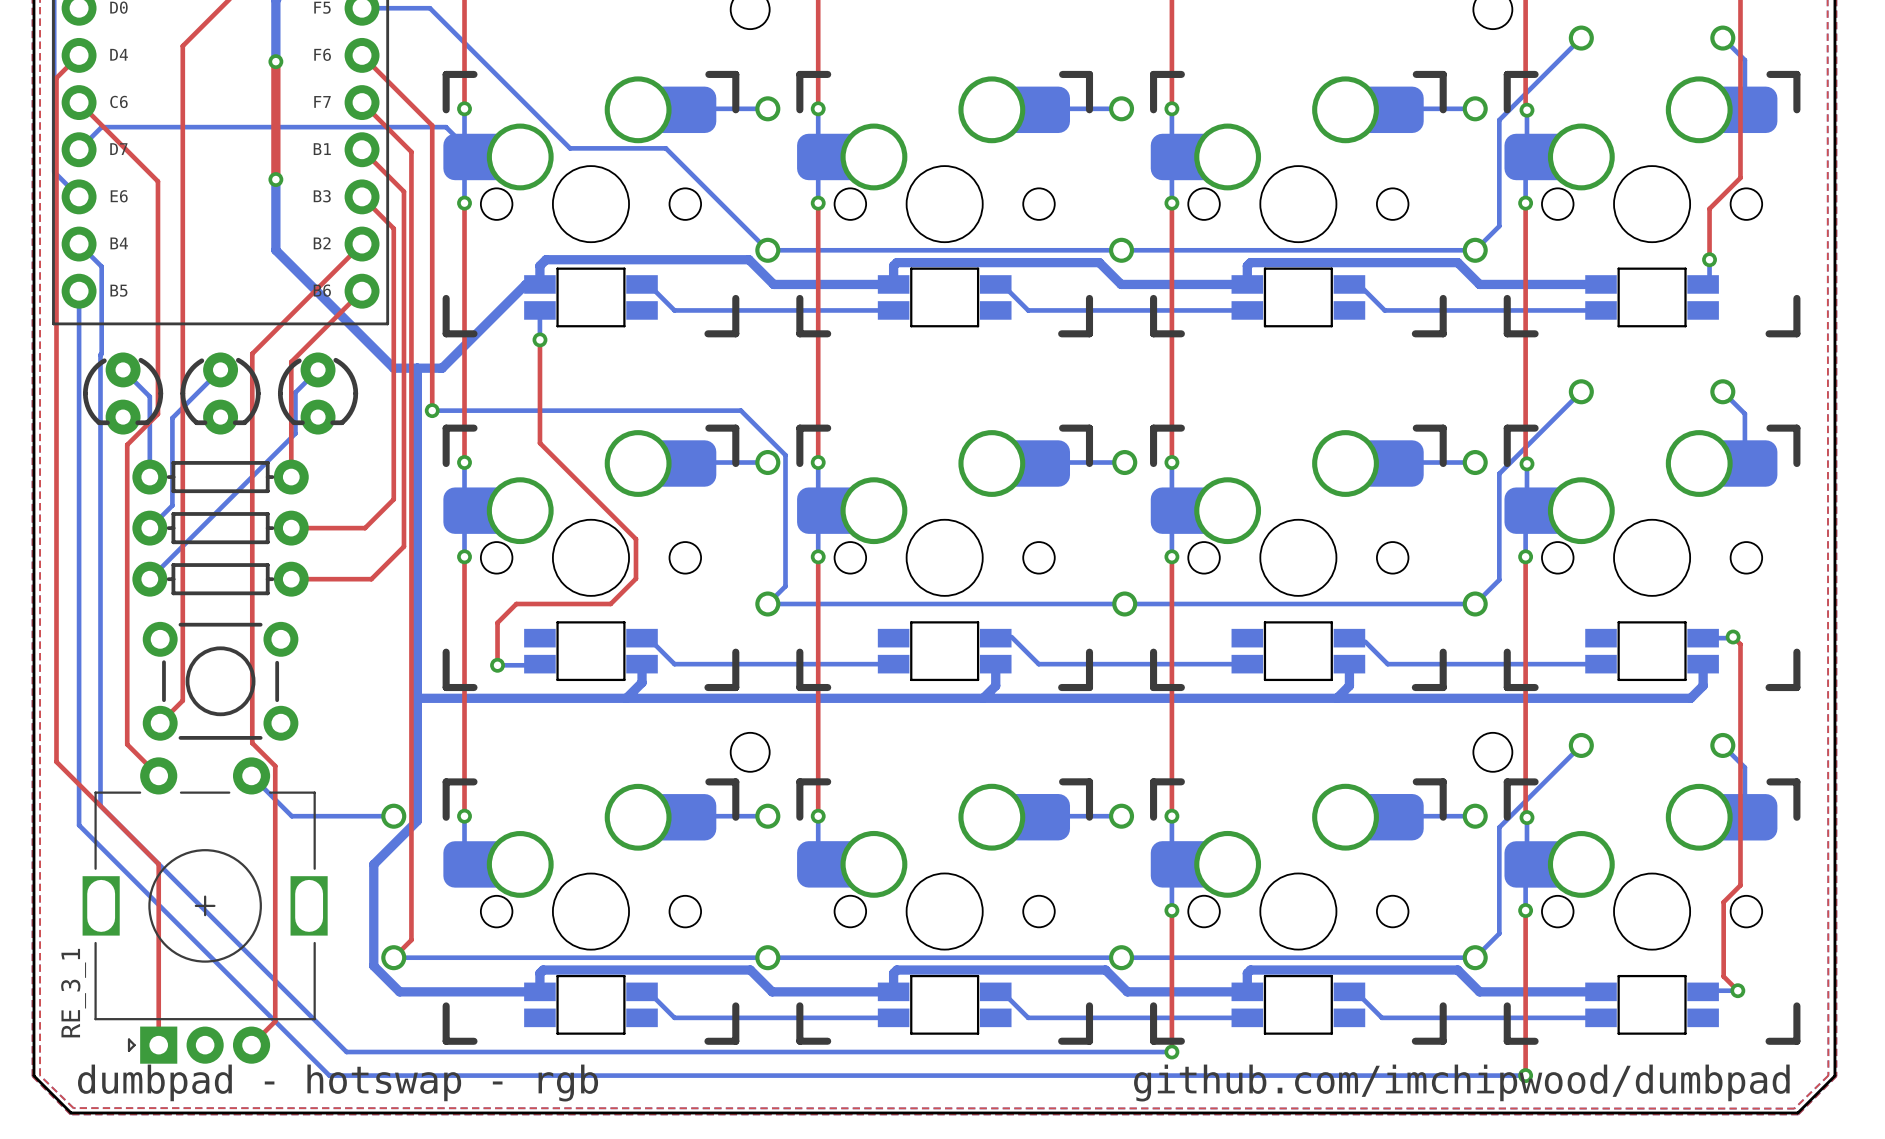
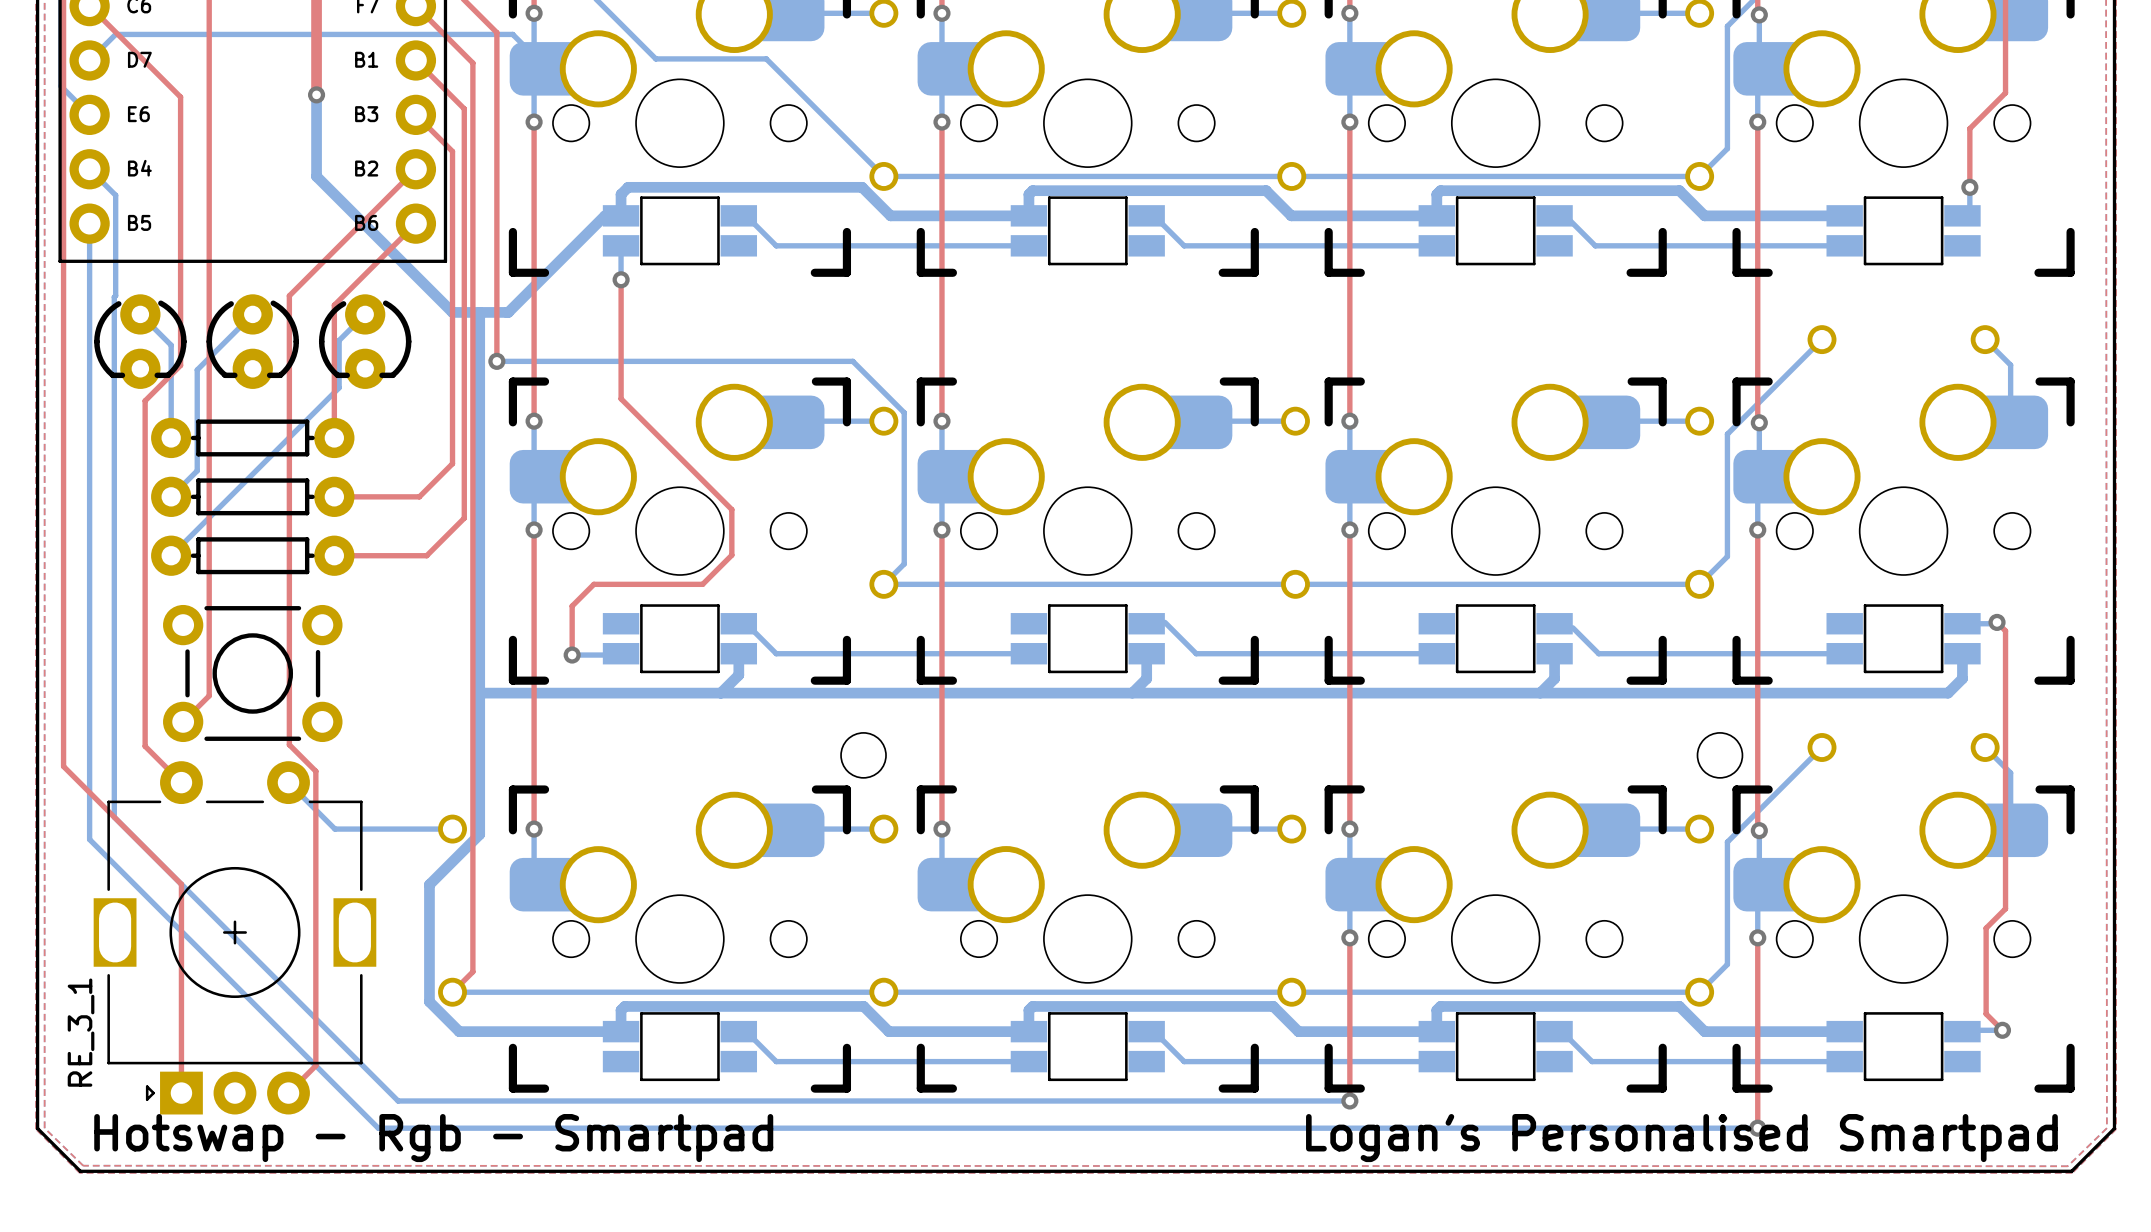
text: dumbpad - hotswap - rgb (338, 1083) -> Hotswap - Rgb - Smartpad (433, 1138)
text: github.com/imchipwood/dumbpad (1461, 1083) -> Logan's Personalised Smartpad (1681, 1138)

